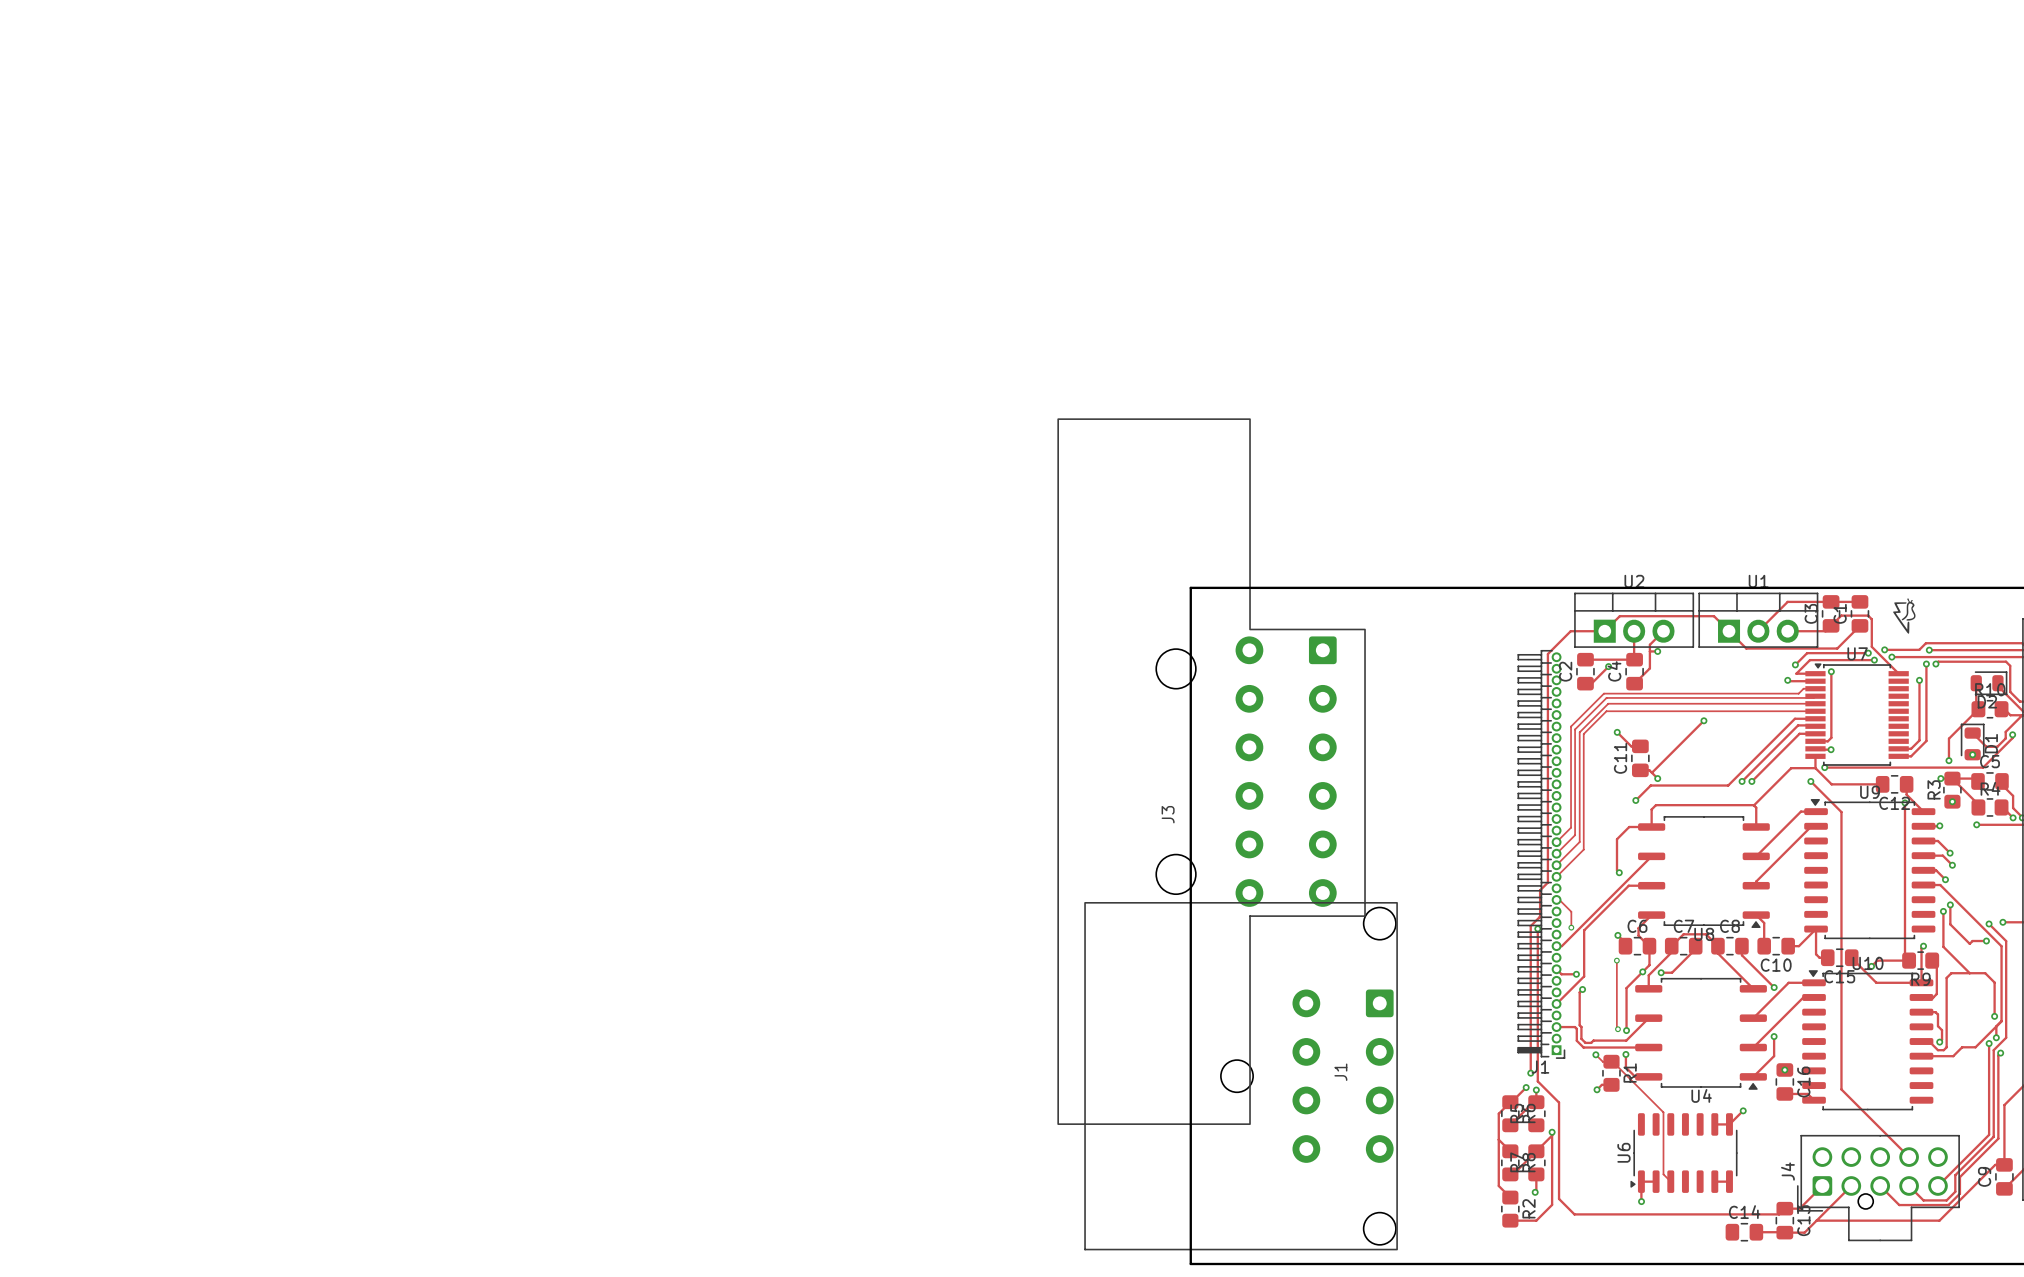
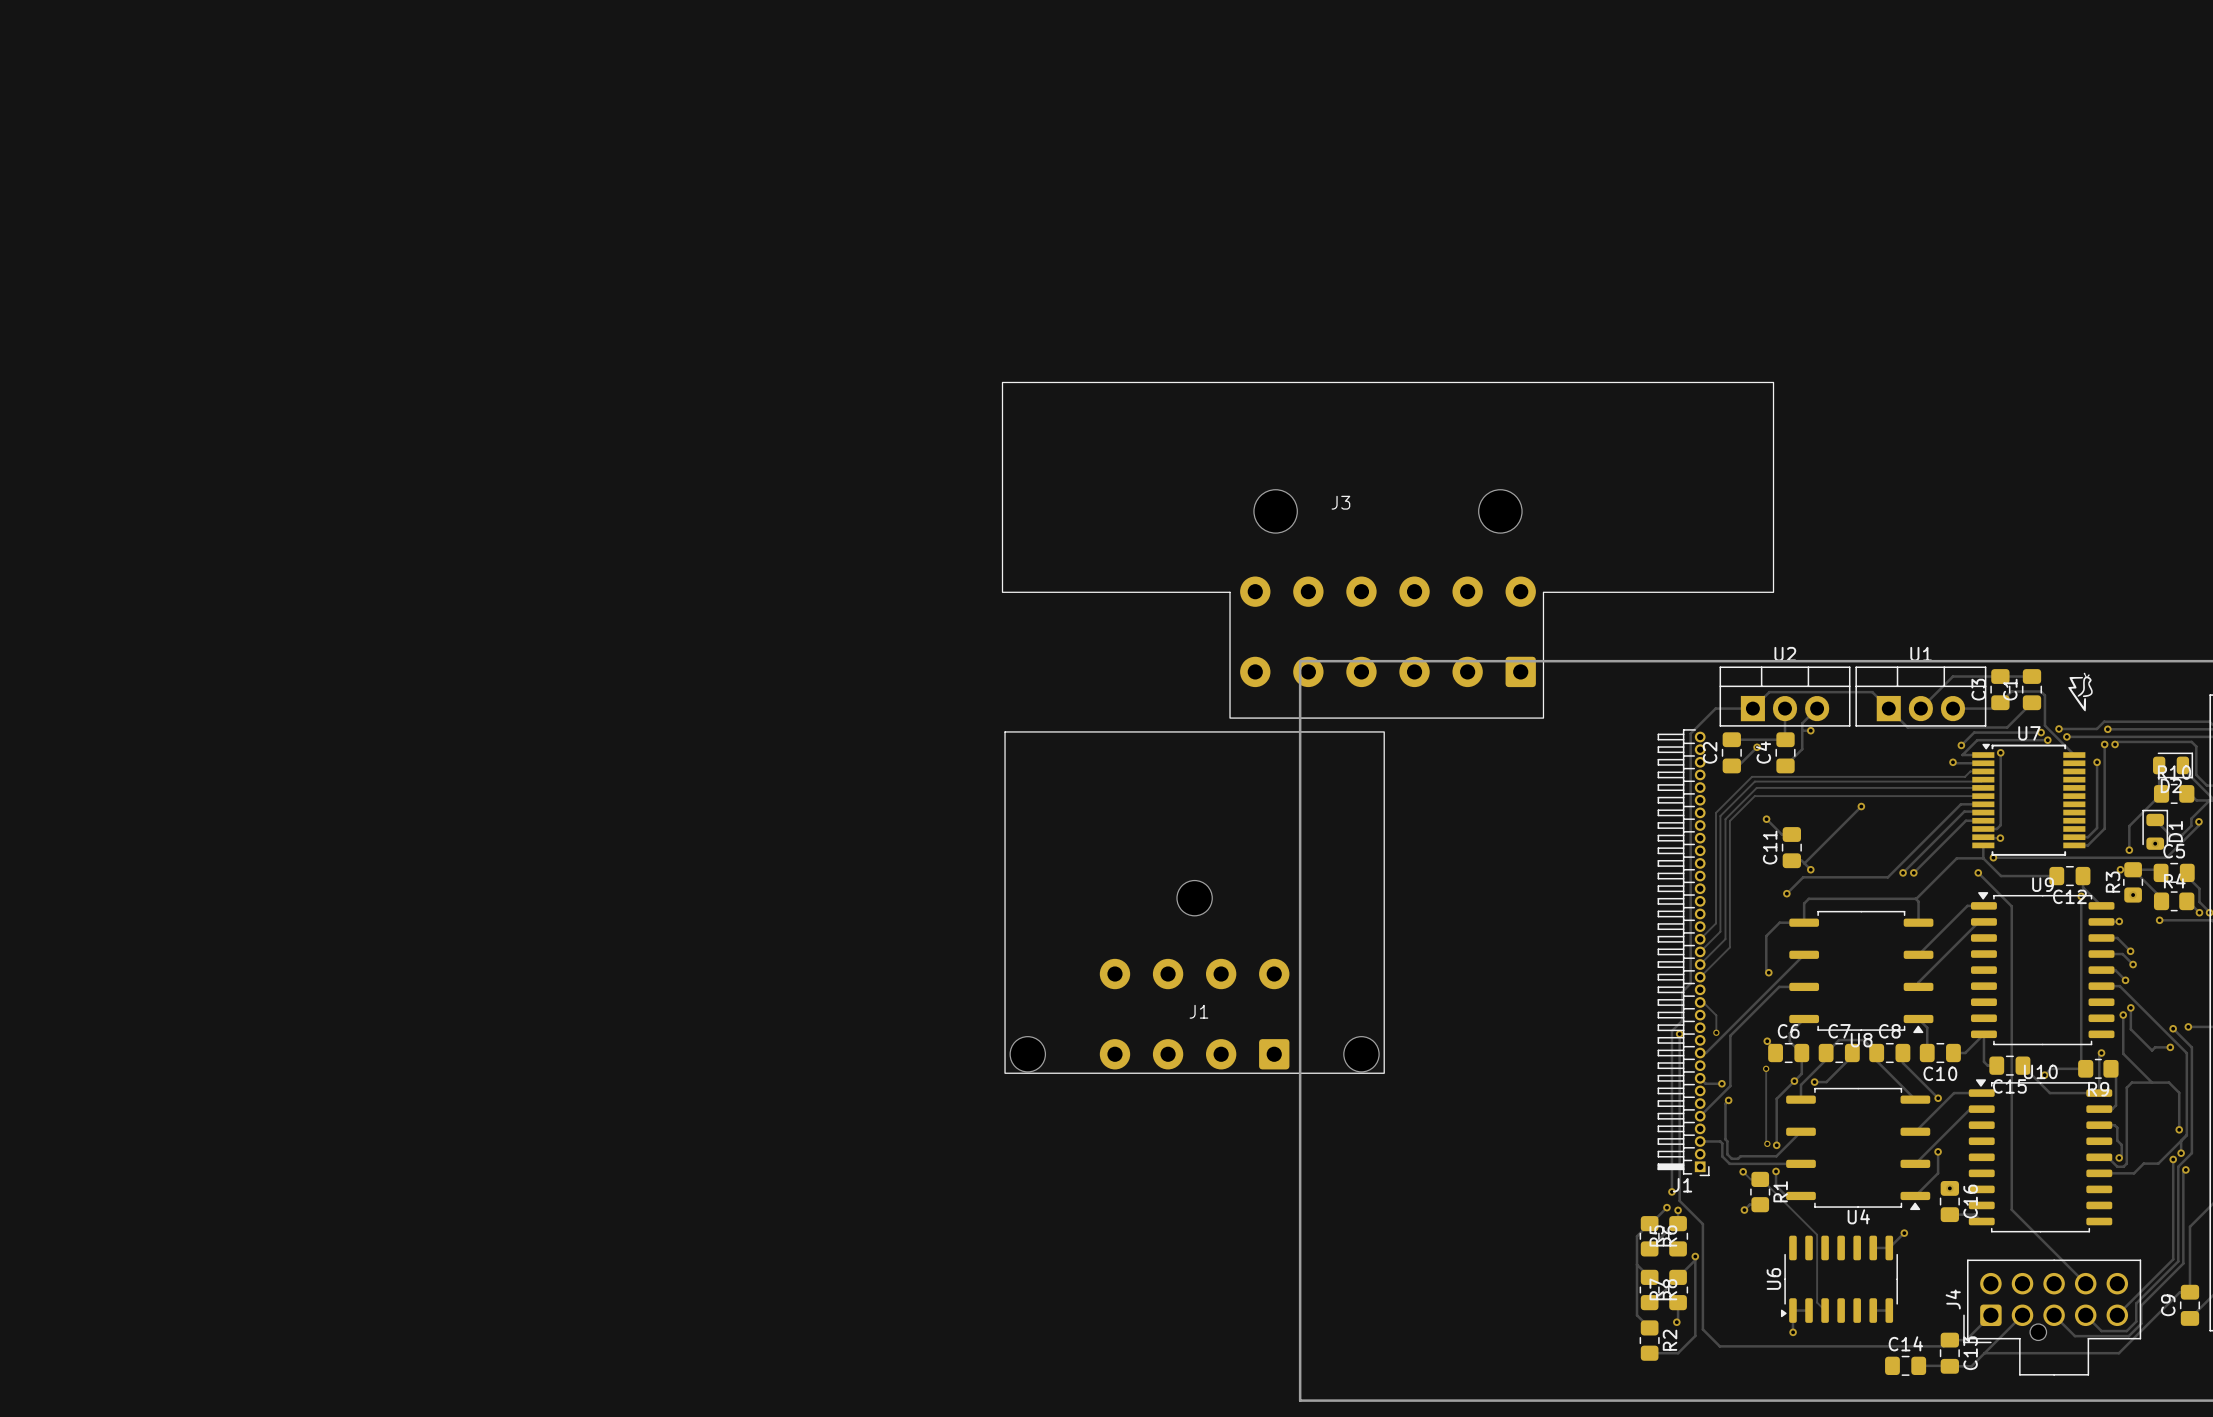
J3 rotation: 0° (1211, 771) -> 90° clockwise (1388, 550)
J1: none -> (1194, 902)
J1: (1241, 1076) -> none

